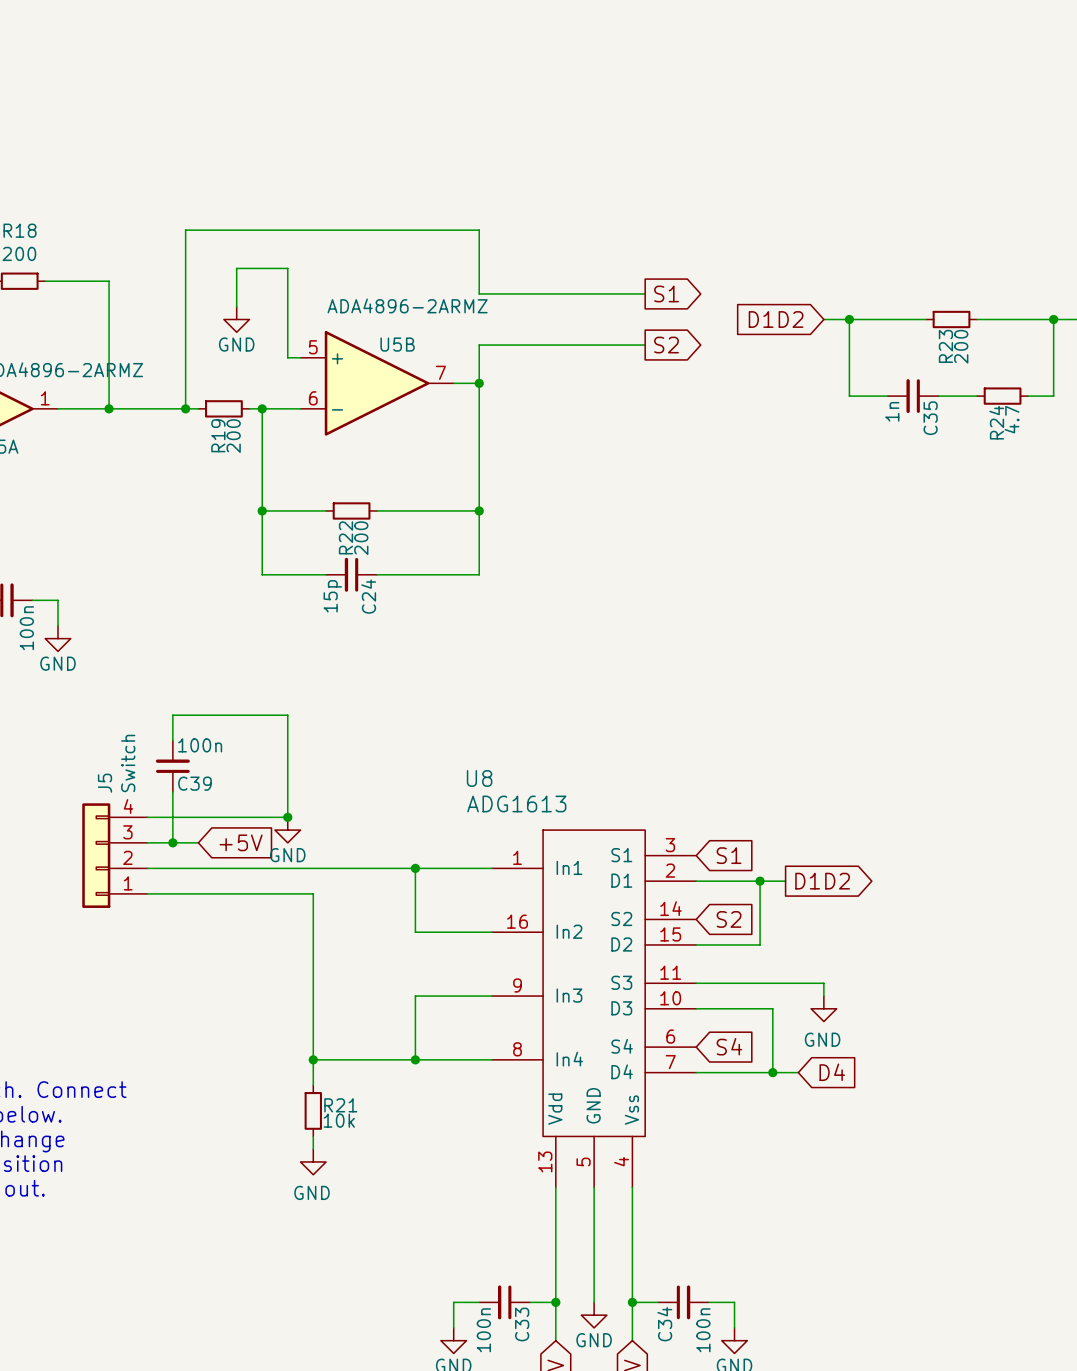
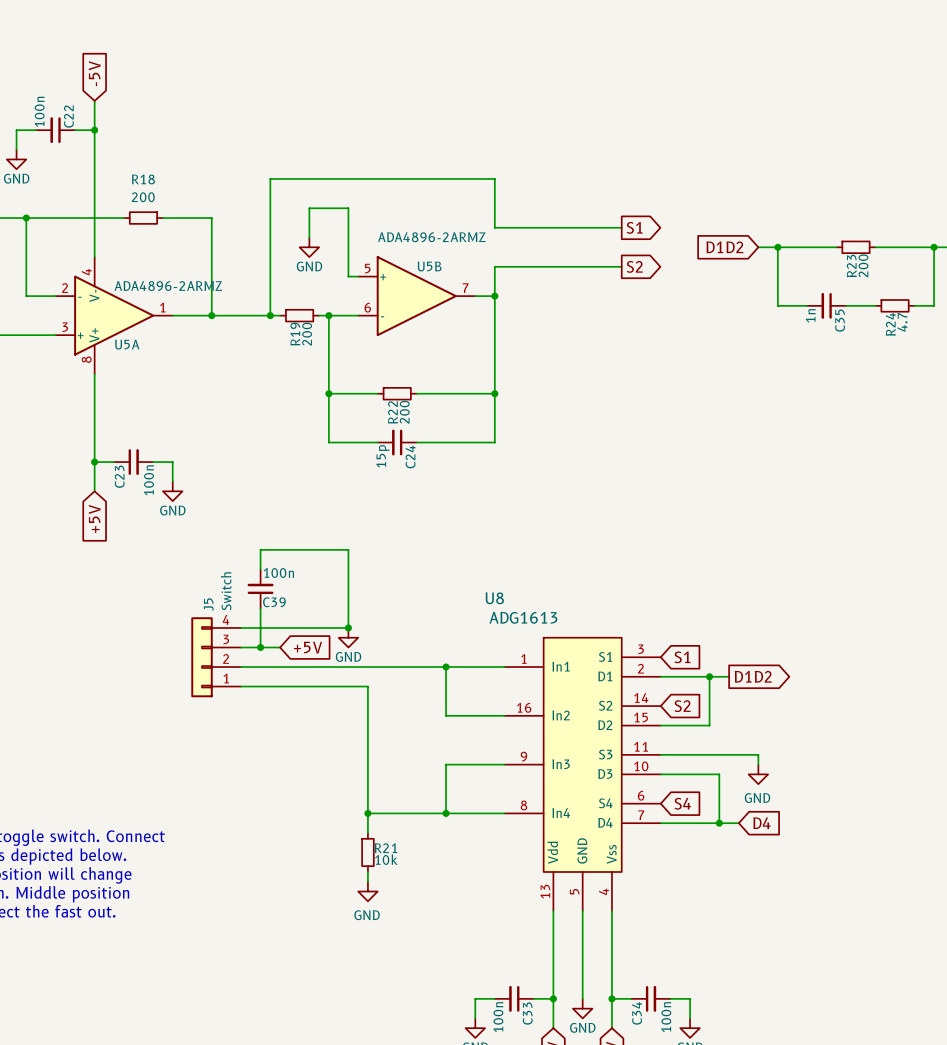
U8 symbol: [491, 830, 697, 1188] -> [504, 637, 661, 912]

